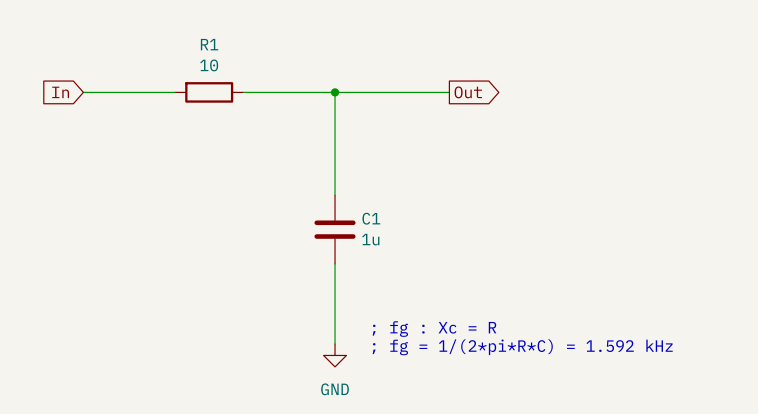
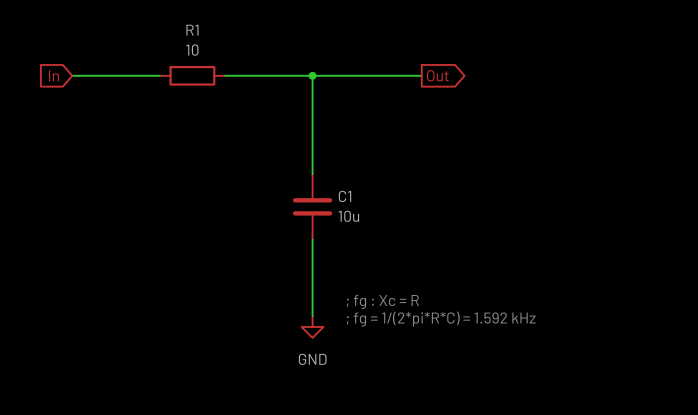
C1 value: 1u (370, 239) -> 10u (348, 216)

